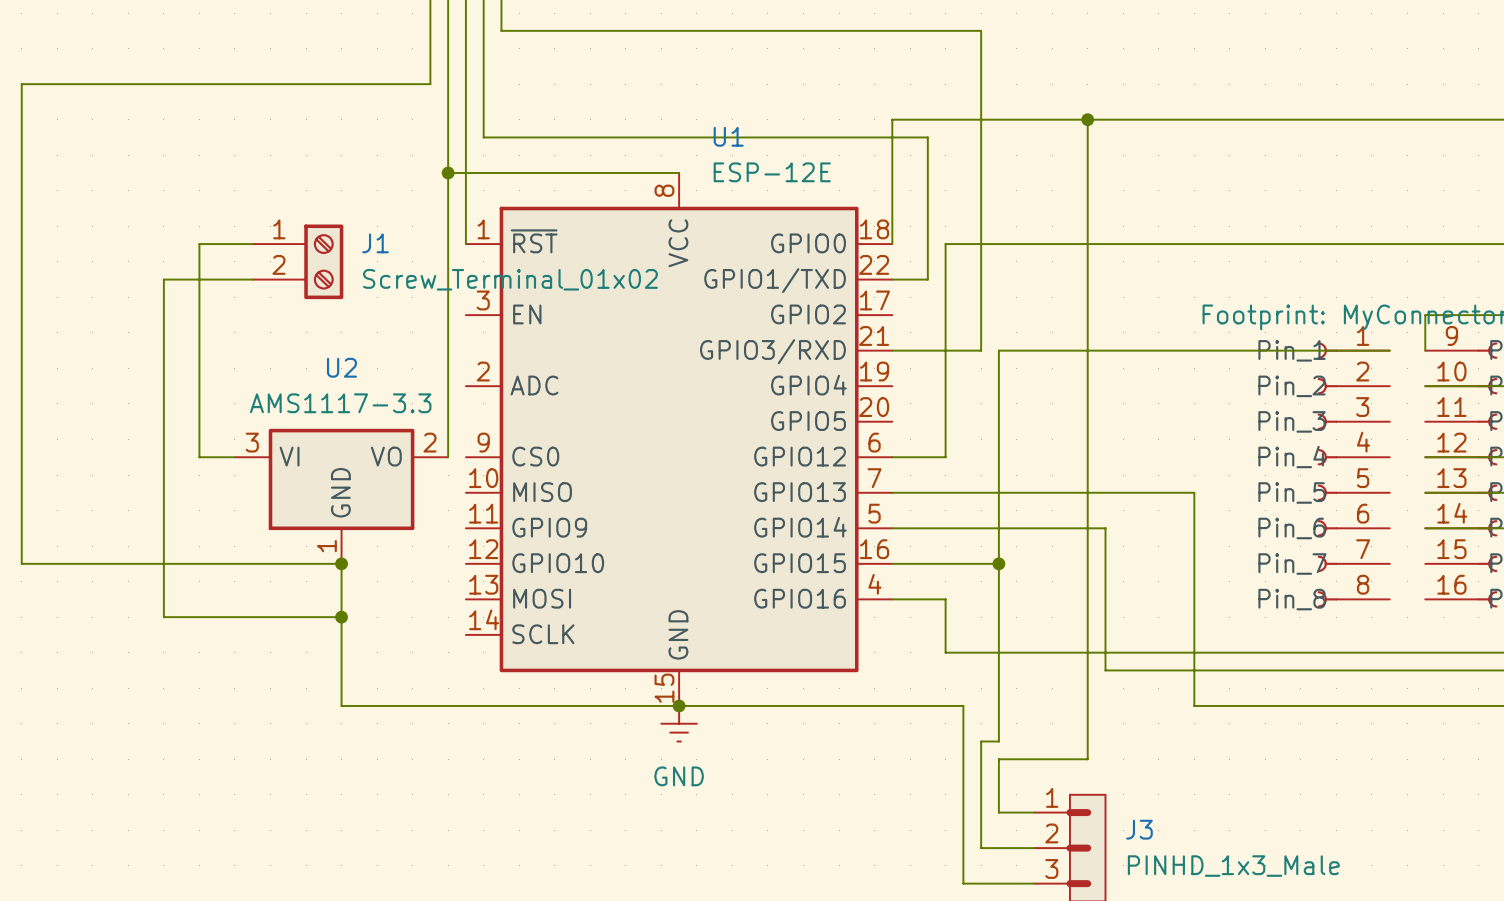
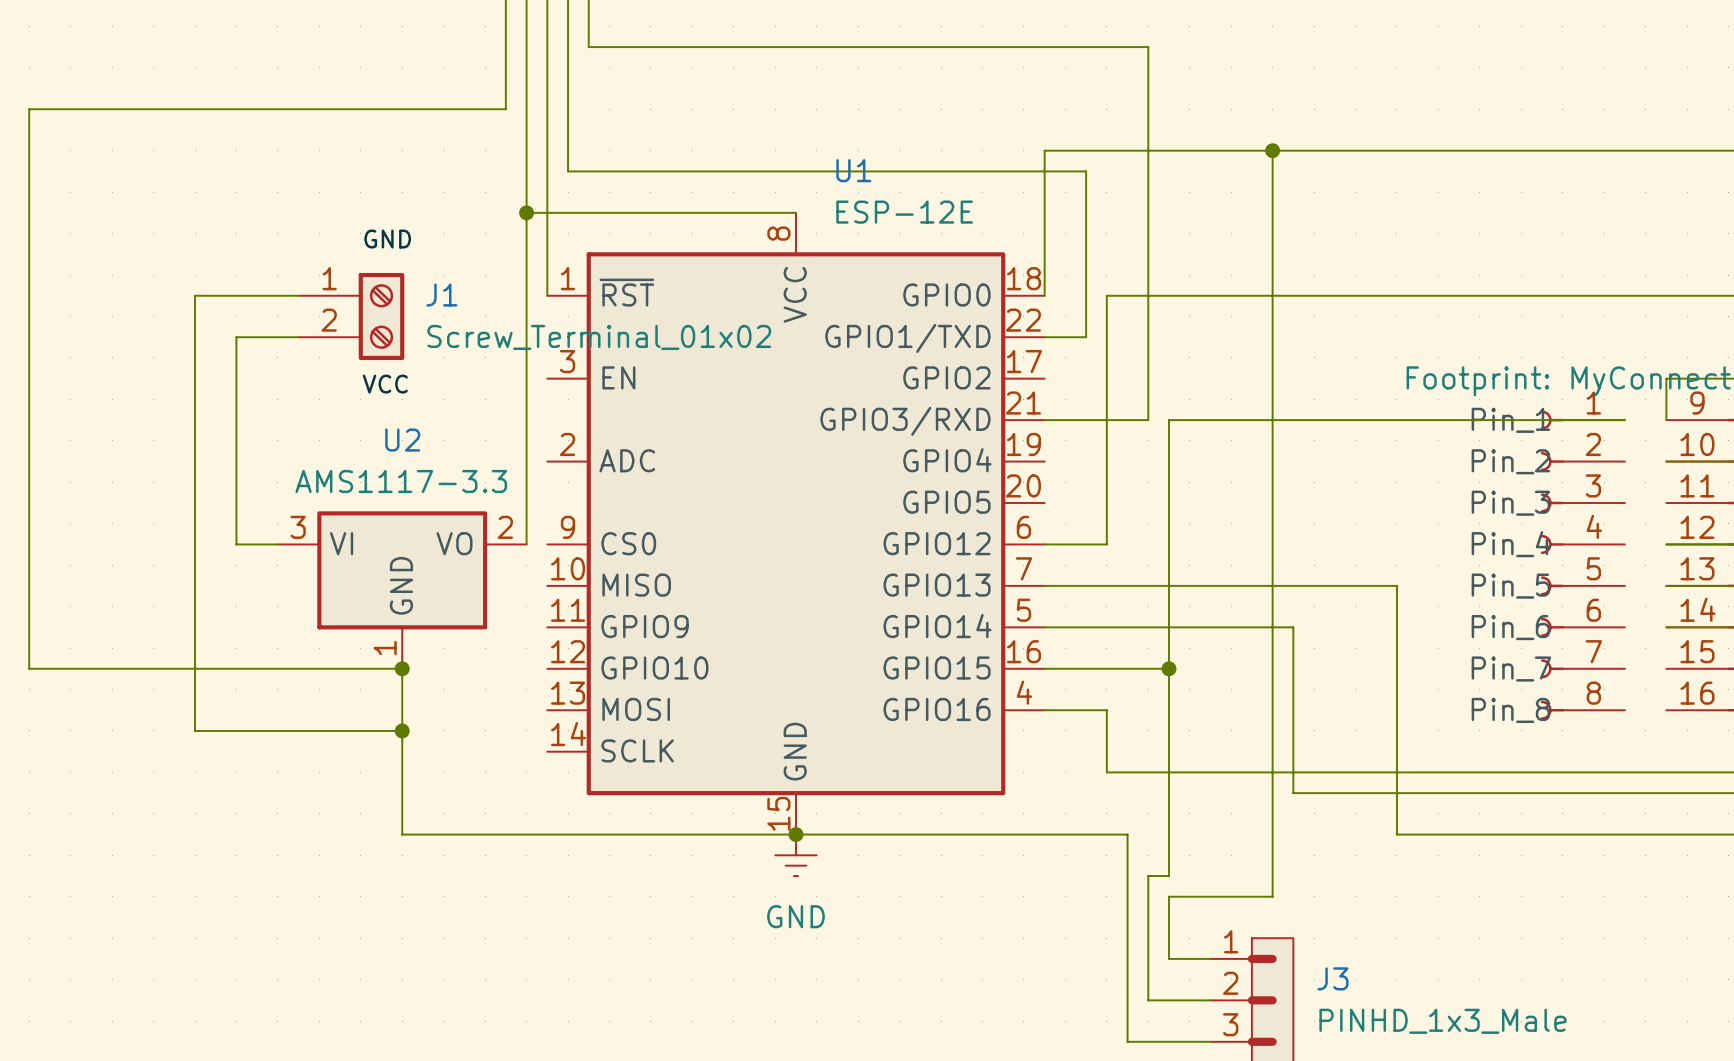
label: none -> GND (387, 239)
wire: (199, 244) (199, 279) (163, 279) -> (236, 295) (195, 295) (195, 337)
label: none -> VCC (385, 384)

